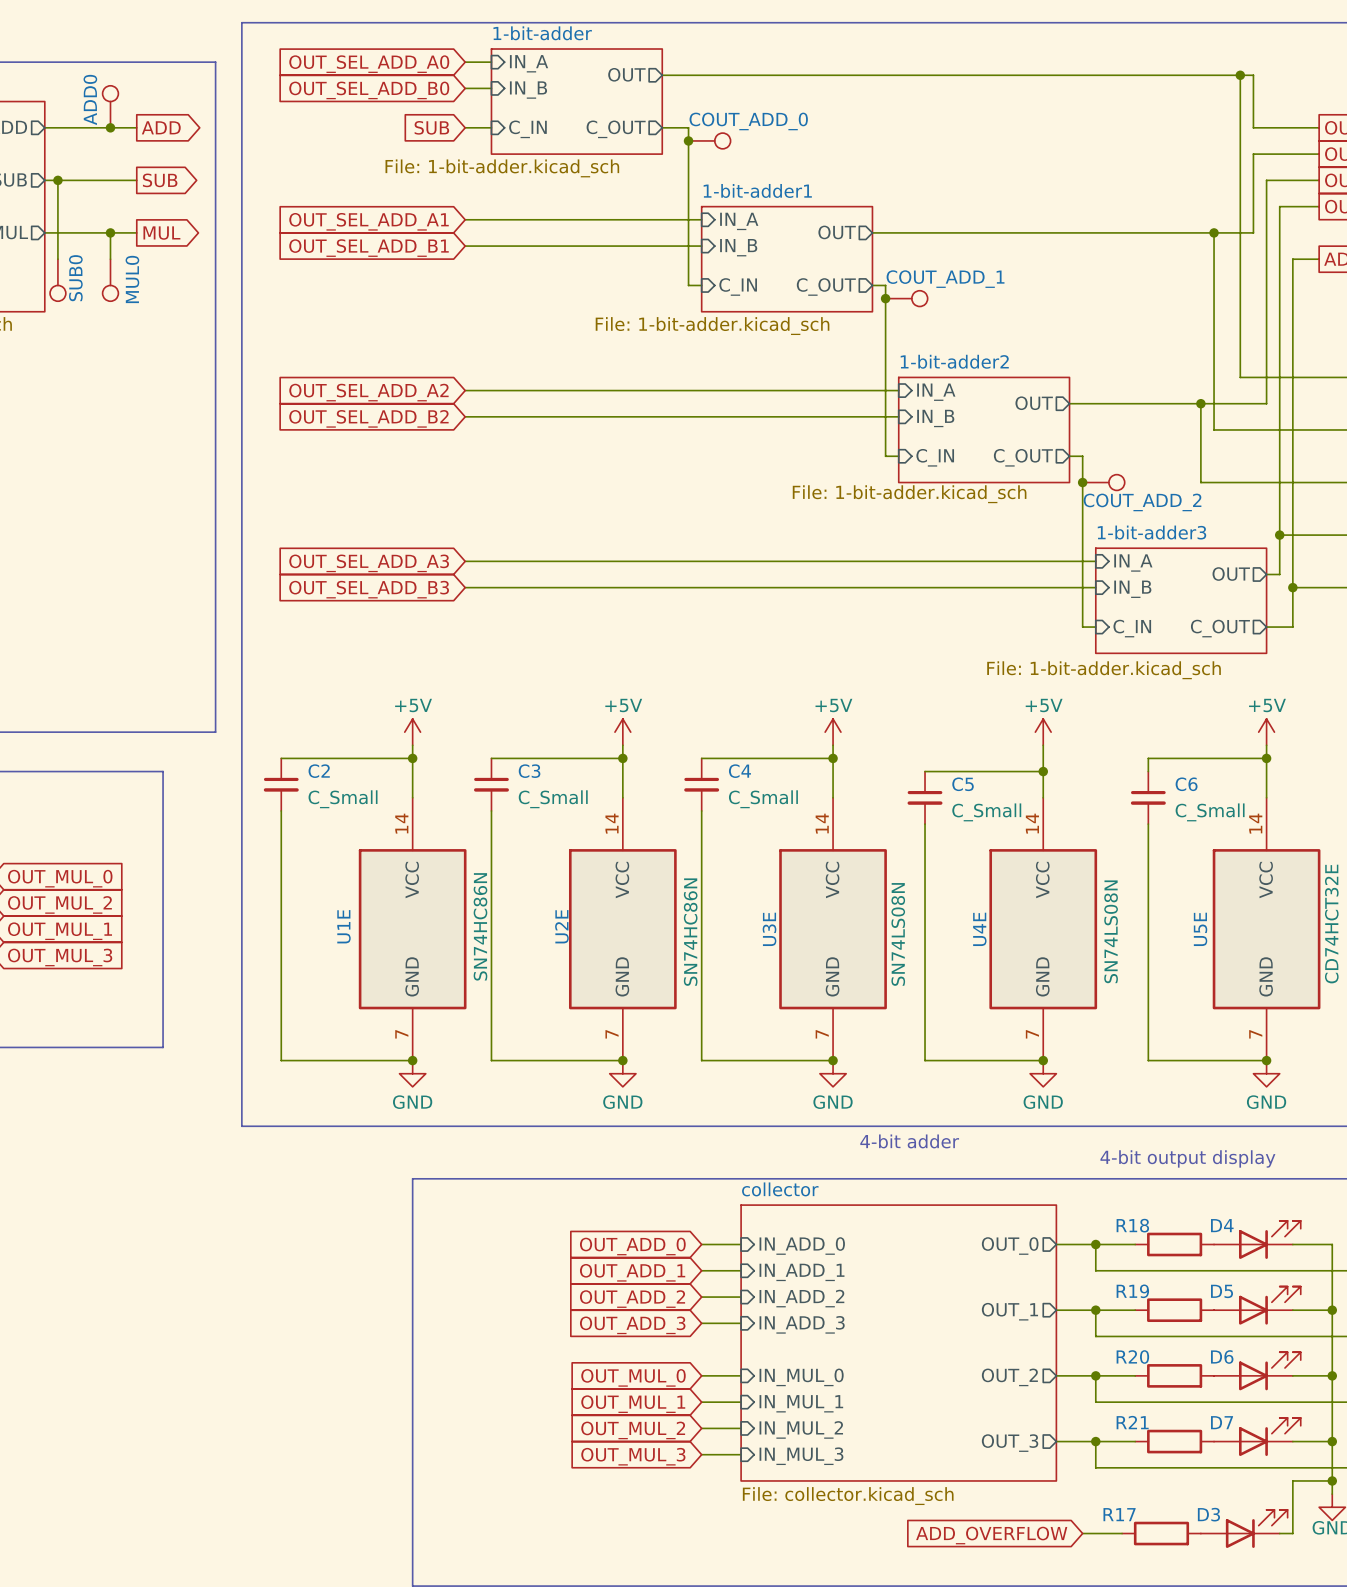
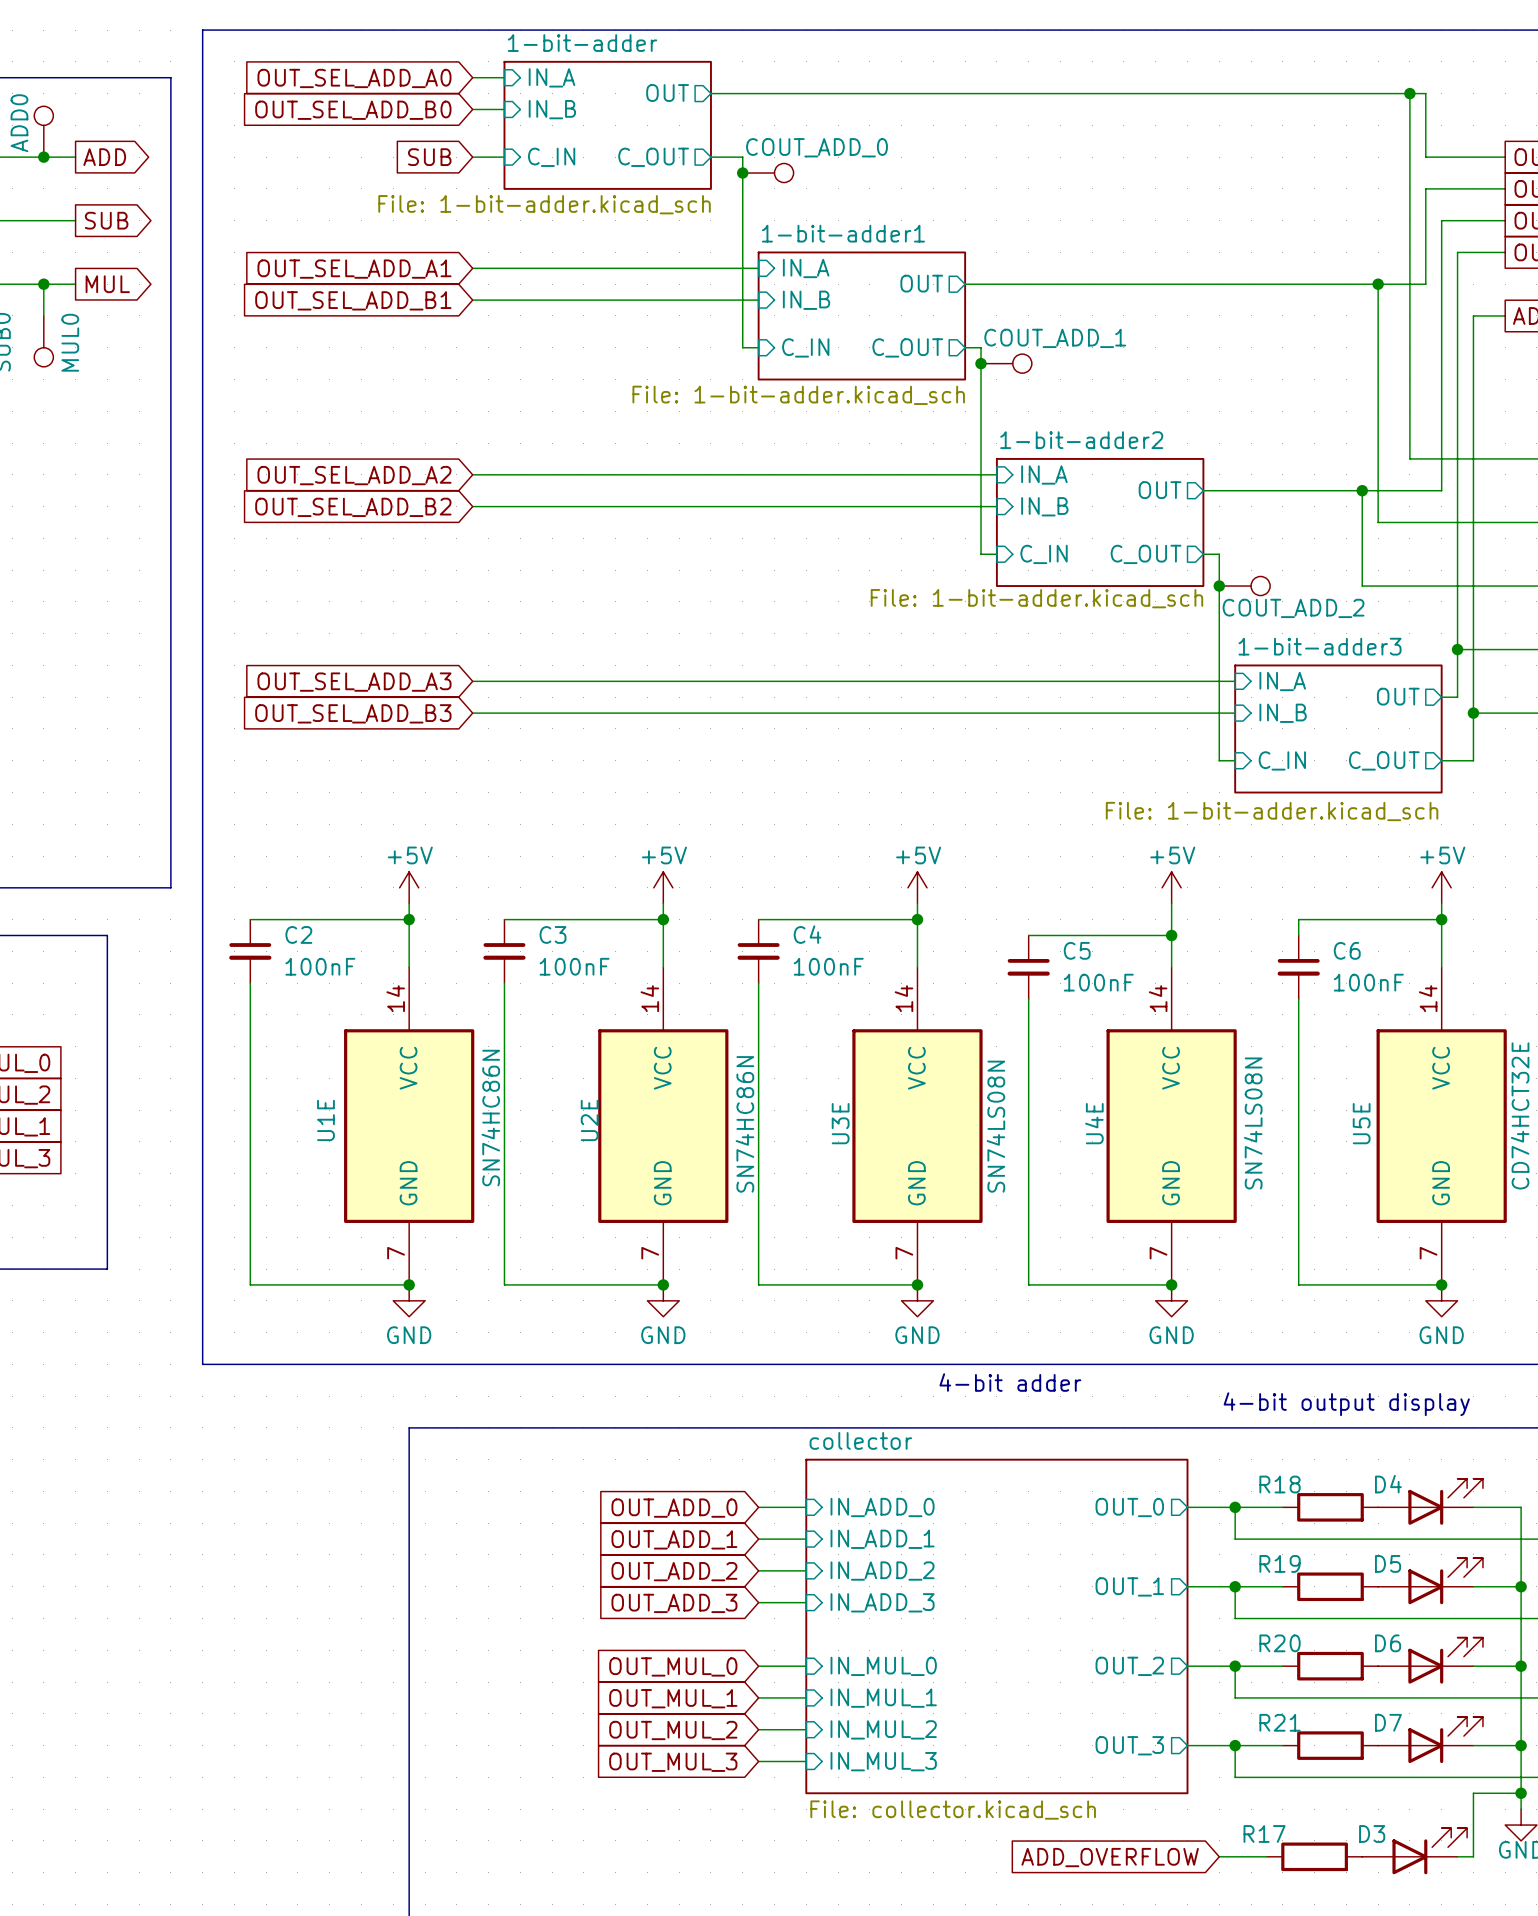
C2 value: C_Small (343, 799) -> 100nF (320, 966)
C3 value: C_Small (553, 799) -> 100nF (574, 966)
C4 value: C_Small (763, 799) -> 100nF (828, 966)
C5 value: C_Small (986, 812) -> 100nF (1098, 982)
C6 value: C_Small (1210, 812) -> 100nF (1368, 982)

